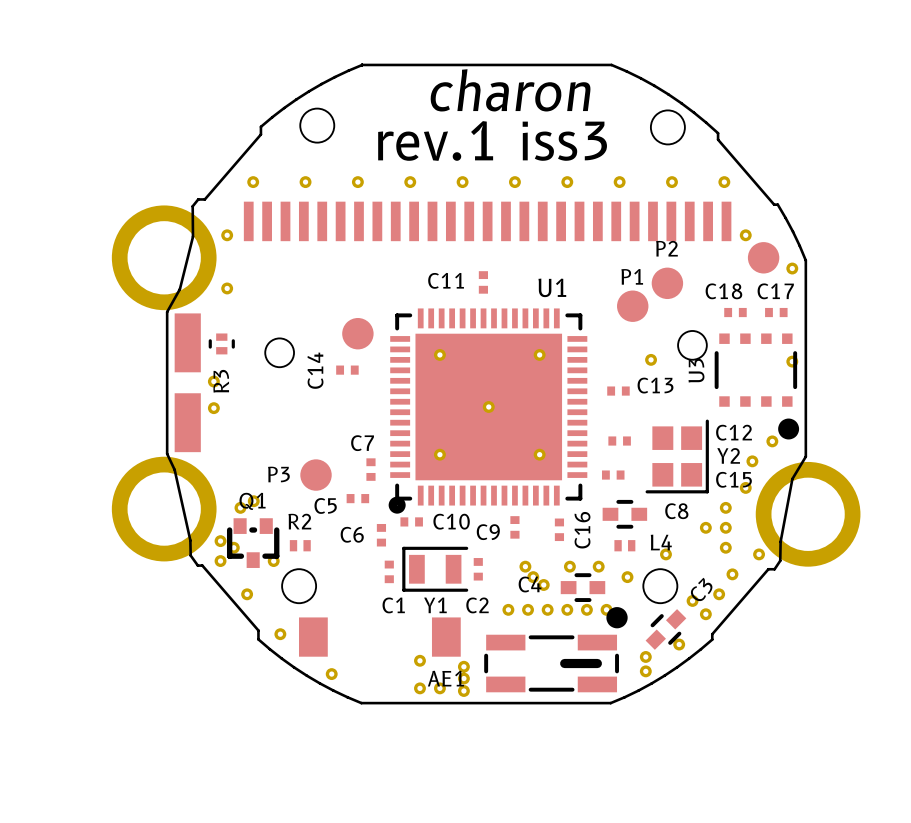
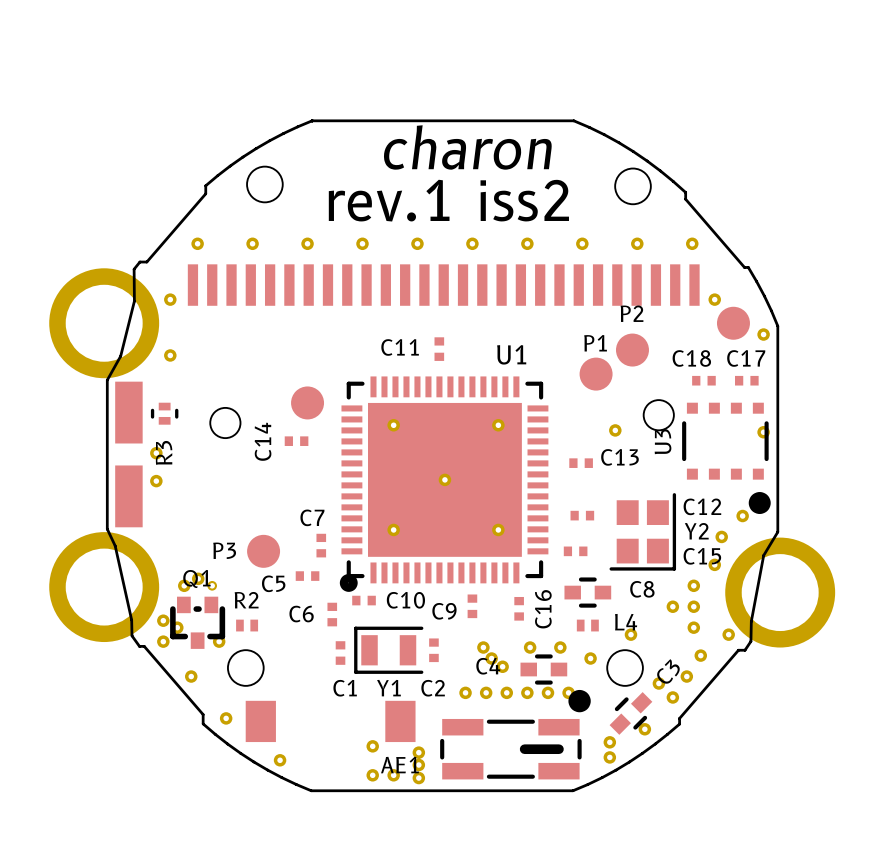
text: rev.1 iss3 (492, 140) -> rev.1 iss2 (448, 200)
part: none -> (212, 585)

